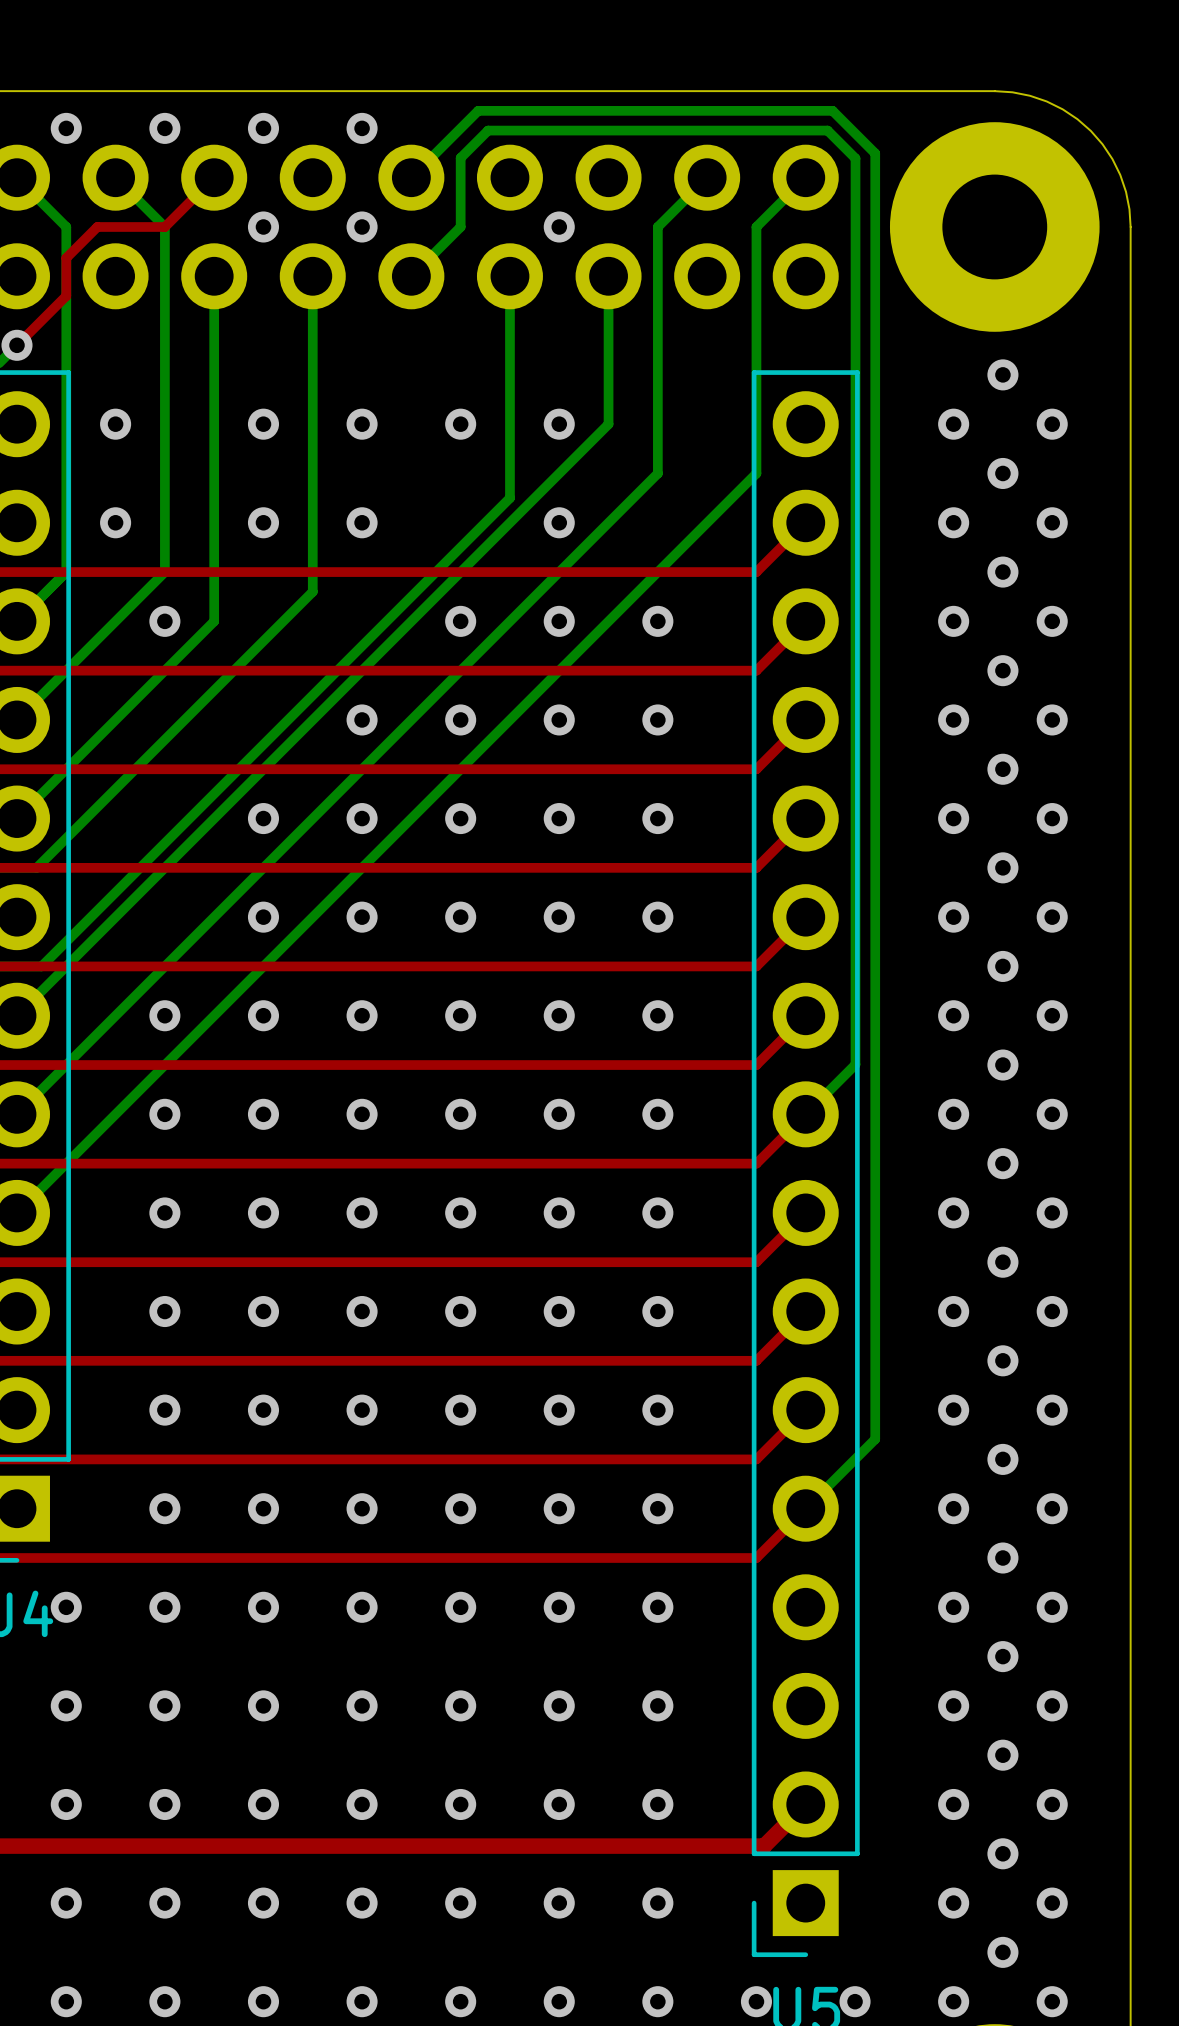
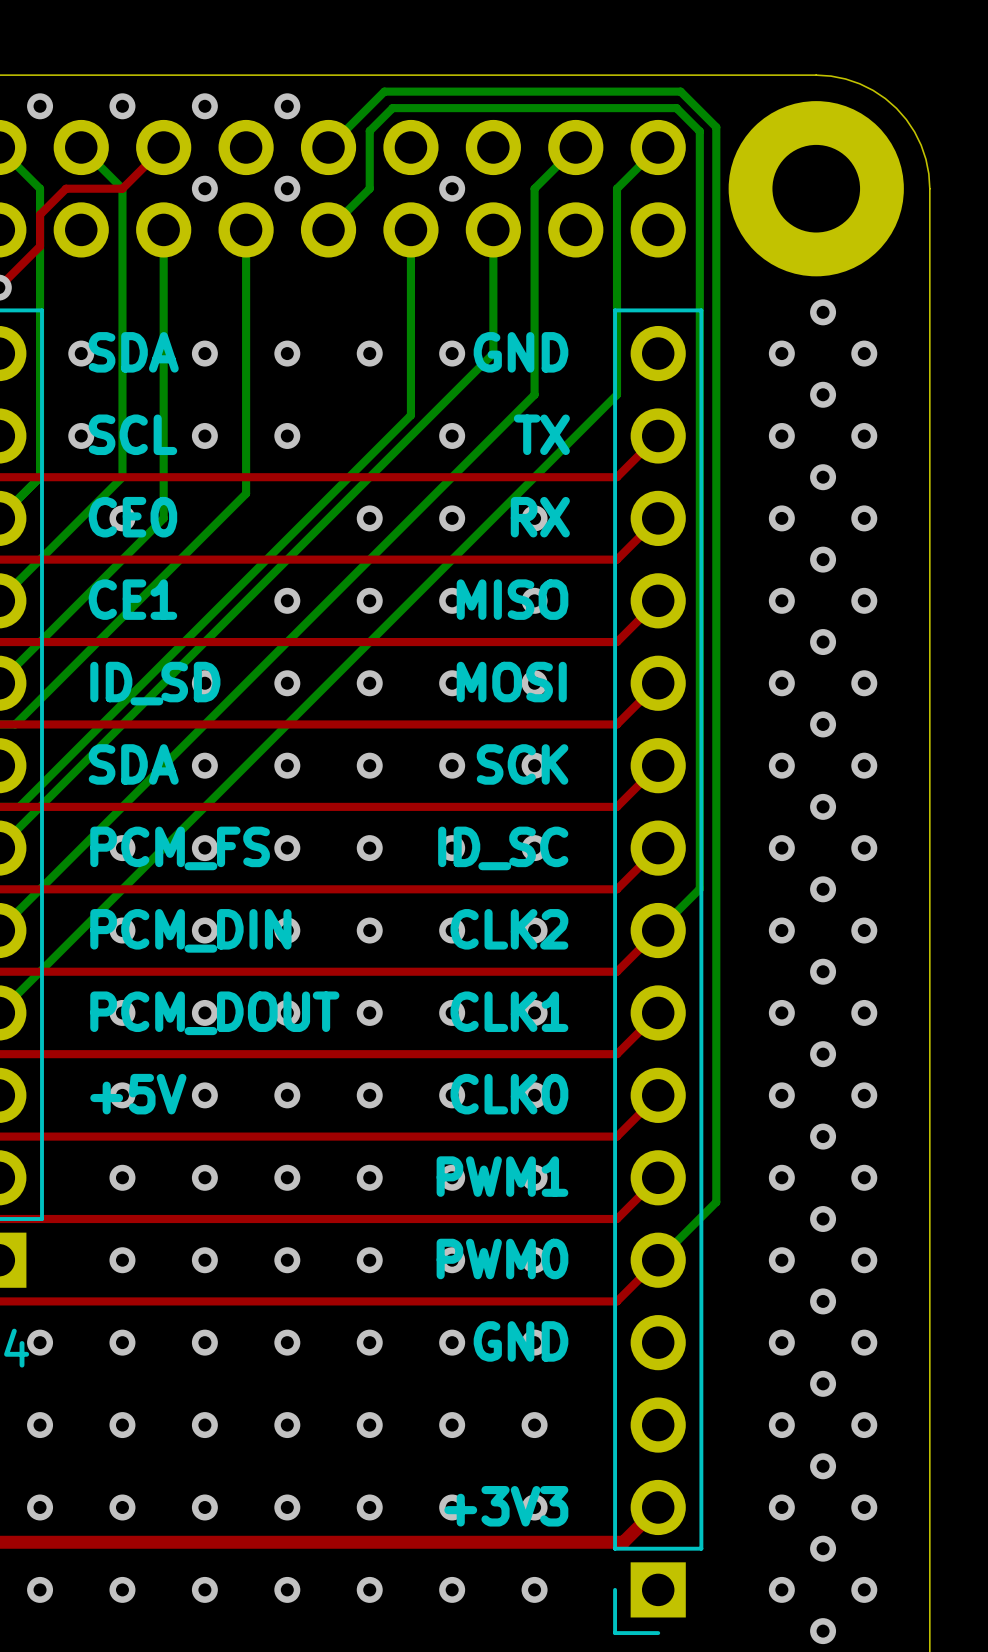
text: none -> SDA (133, 352)
text: none -> GND (521, 352)
text: none -> SCL (132, 434)
text: none -> TX (541, 434)
text: none -> CE0 (132, 517)
text: none -> RX (540, 517)
text: none -> CE1 (132, 599)
text: none -> MISO (512, 599)
text: none -> MOSI (511, 682)
text: none -> ID_SD (155, 683)
text: none -> SDA (133, 764)
text: none -> SCK (522, 764)
text: none -> PCM_FS (180, 848)
text: none -> ID_SC (503, 848)
text: none -> CLK2 (509, 929)
text: none -> PCM_DIN (190, 930)
text: none -> CLK1 (509, 1011)
text: none -> PCM_DOUT (214, 1013)
text: none -> +5V (138, 1094)
text: none -> CLK0 (509, 1094)
text: none -> PWM1 (502, 1176)
text: none -> PWM0 (502, 1259)
text: none -> GND (521, 1341)
text: none -> +3V3 (506, 1506)

